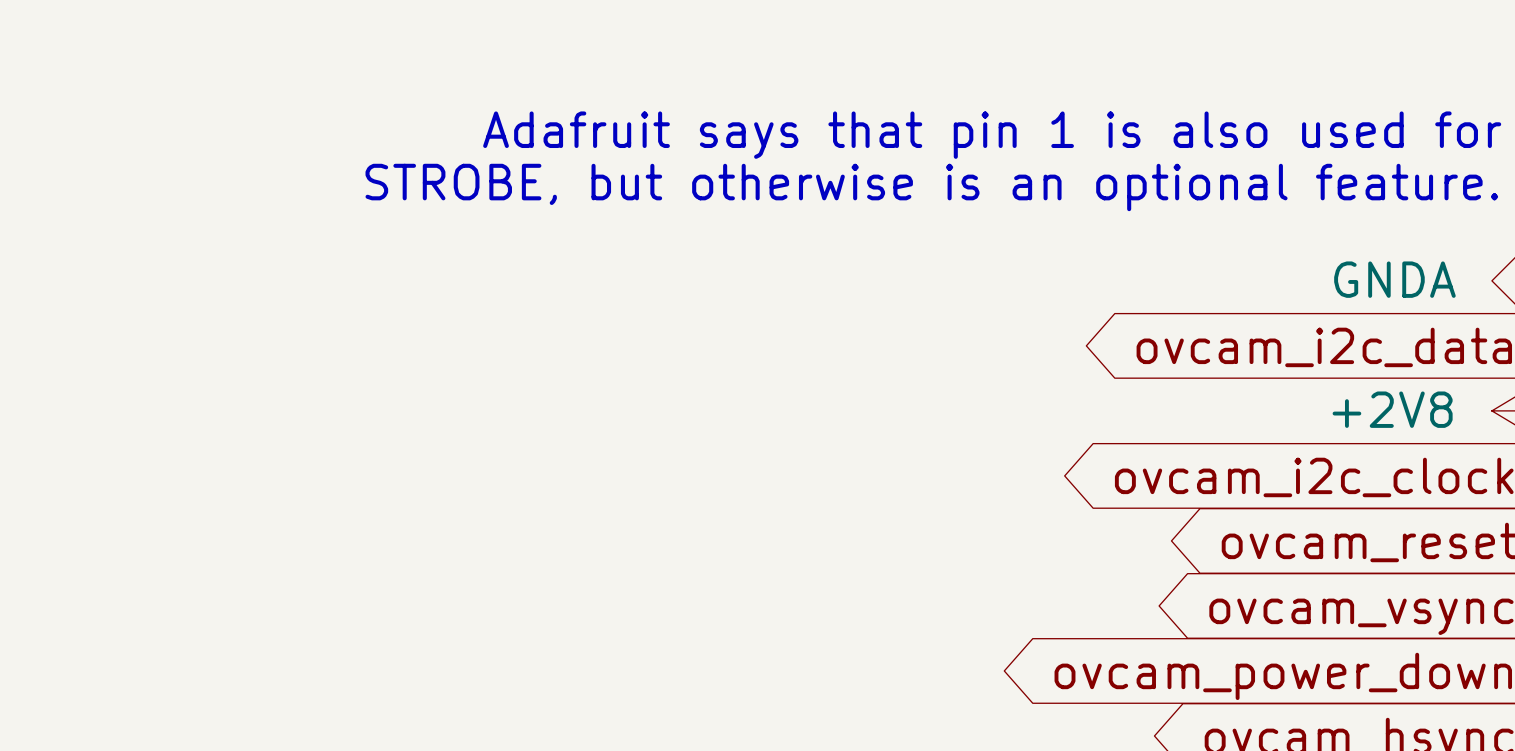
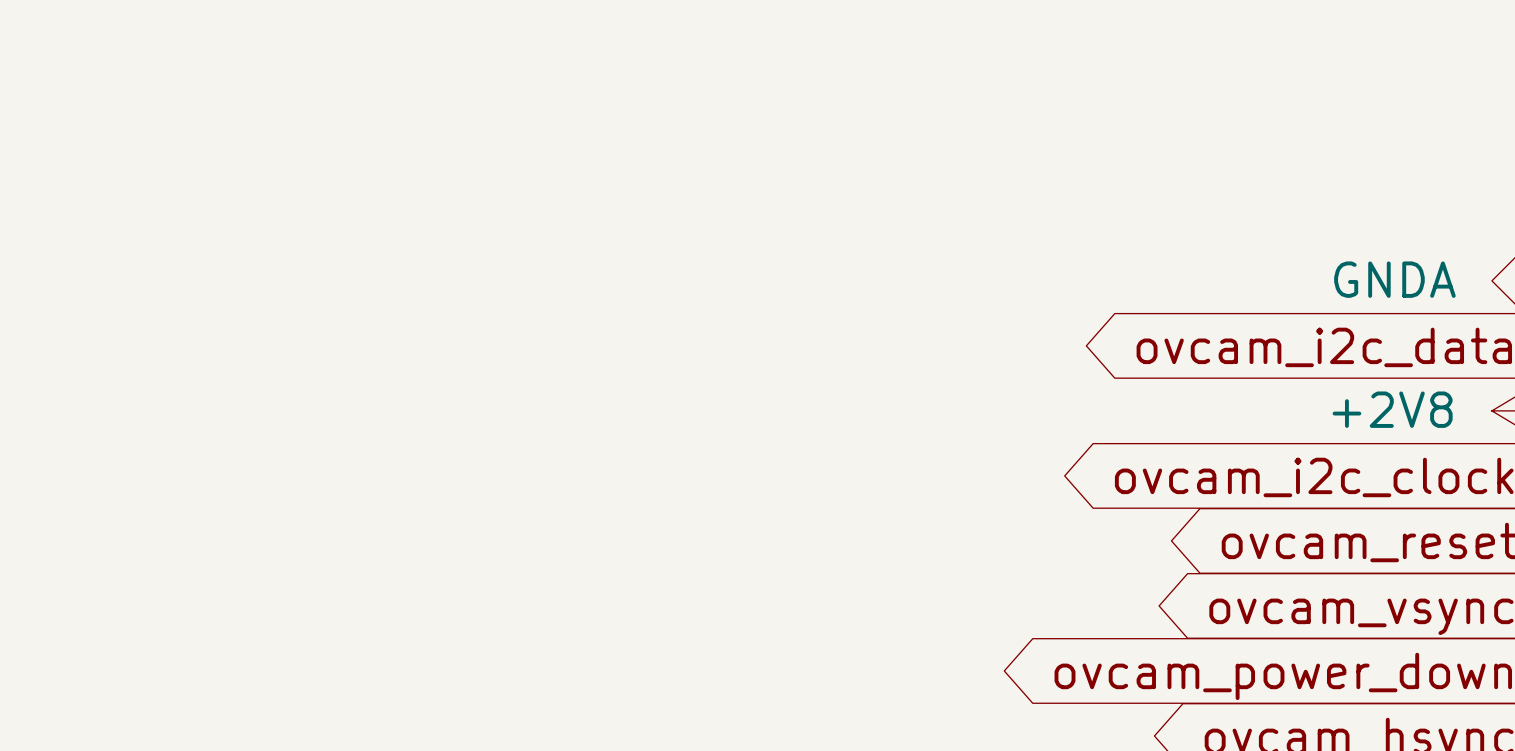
text: Adafruit says that pin 1 is also used for (992, 135) -> none
text: STROBE, but otherwise is an optional feature. (931, 187) -> none

